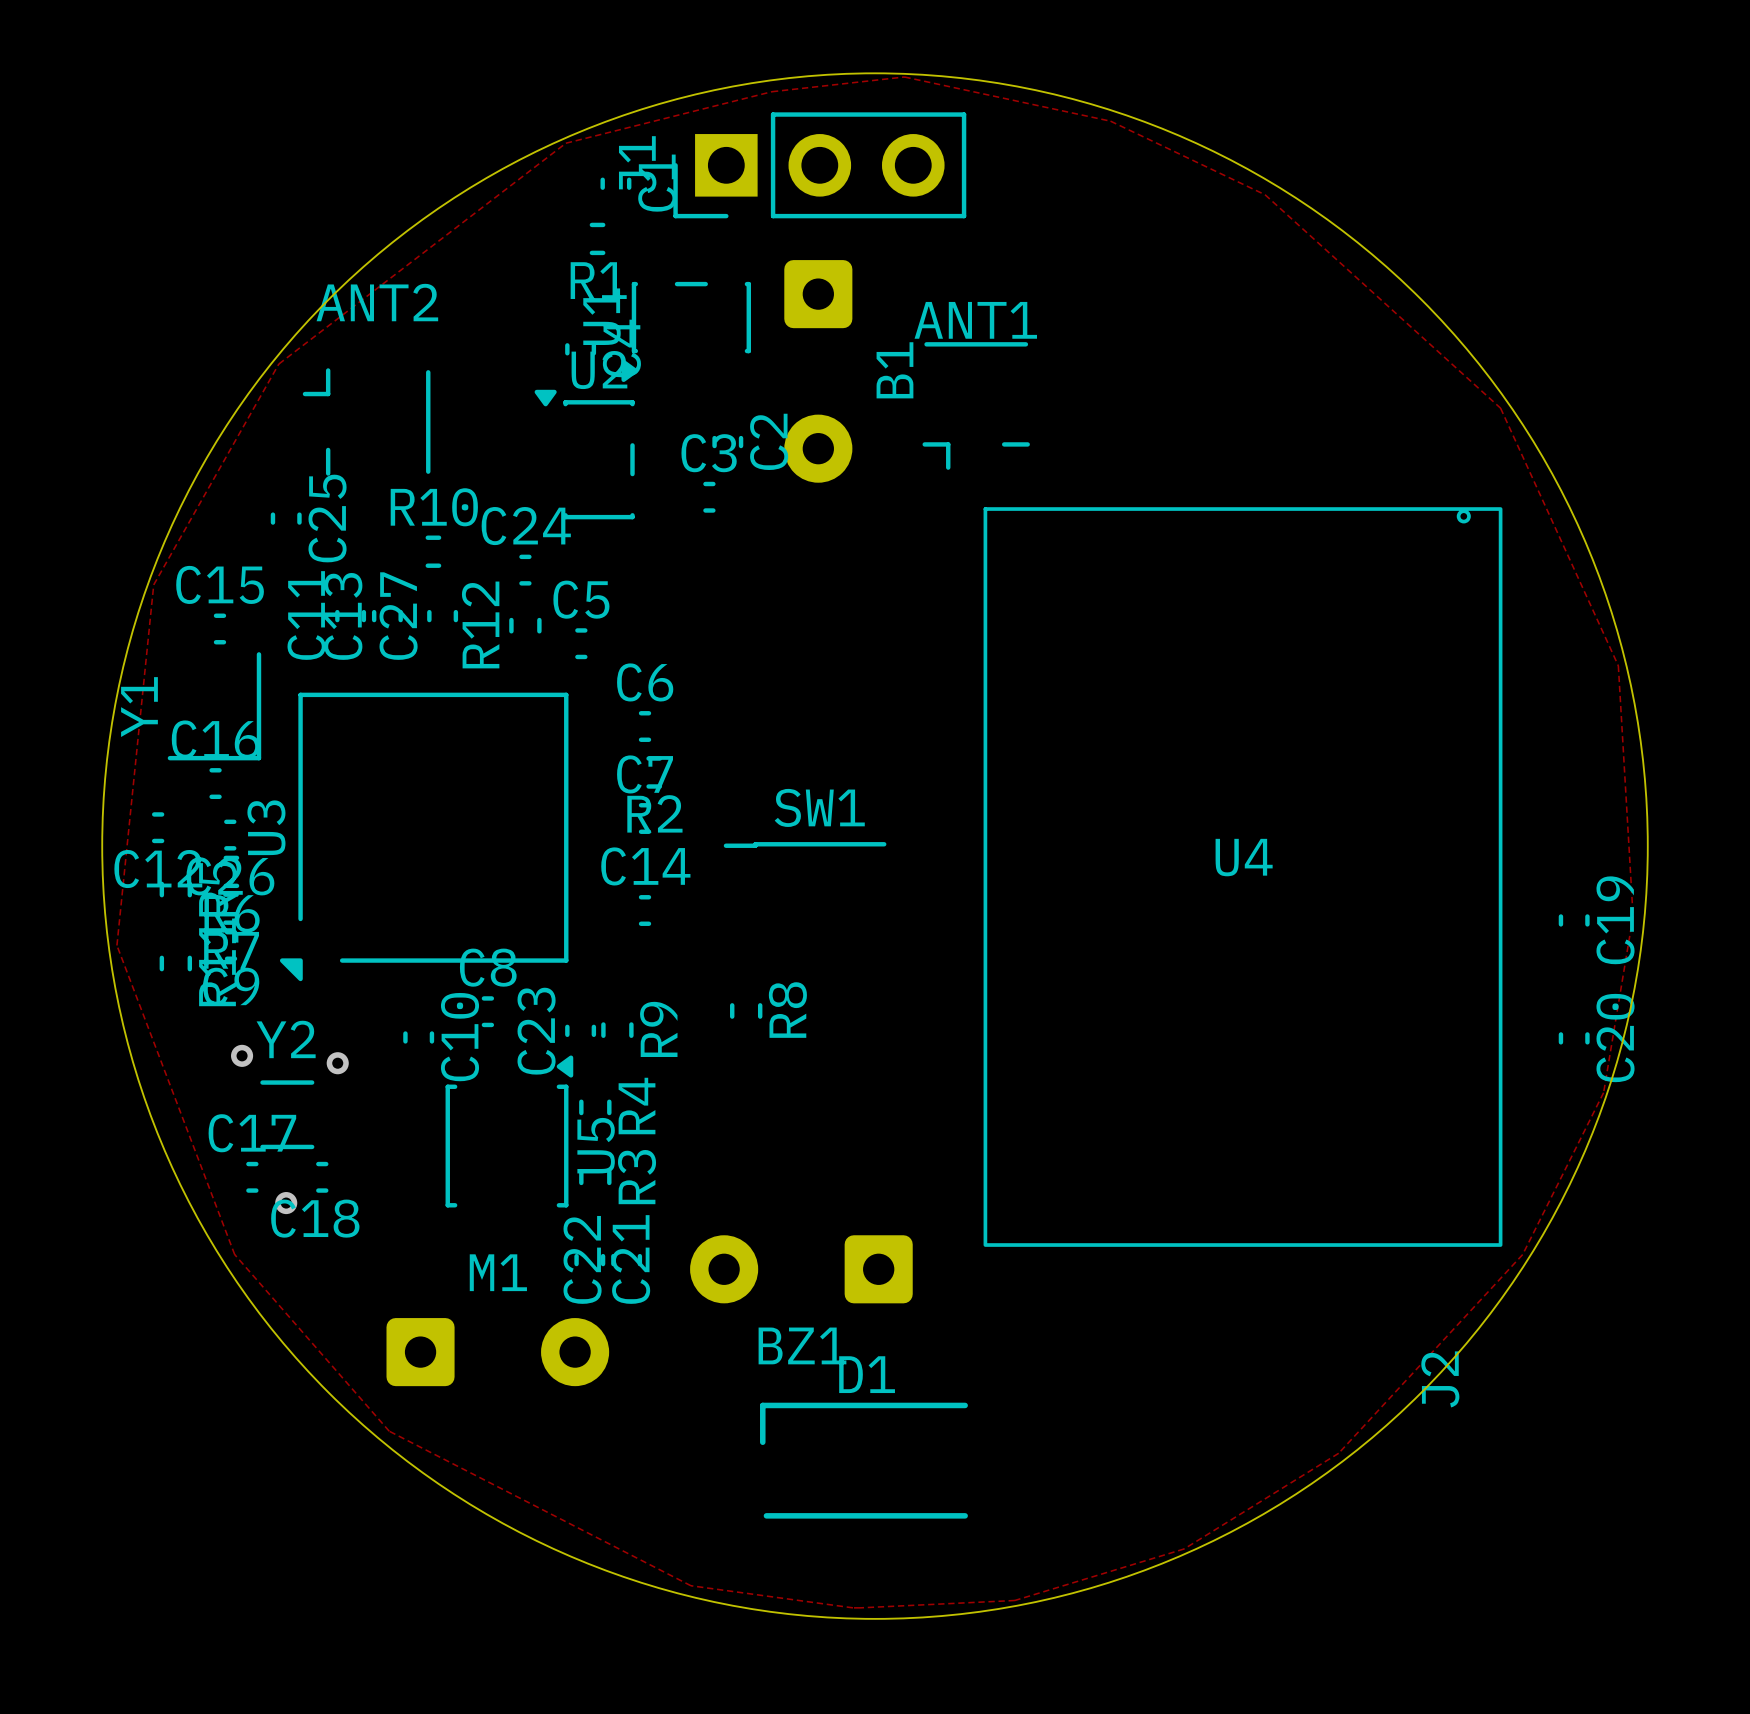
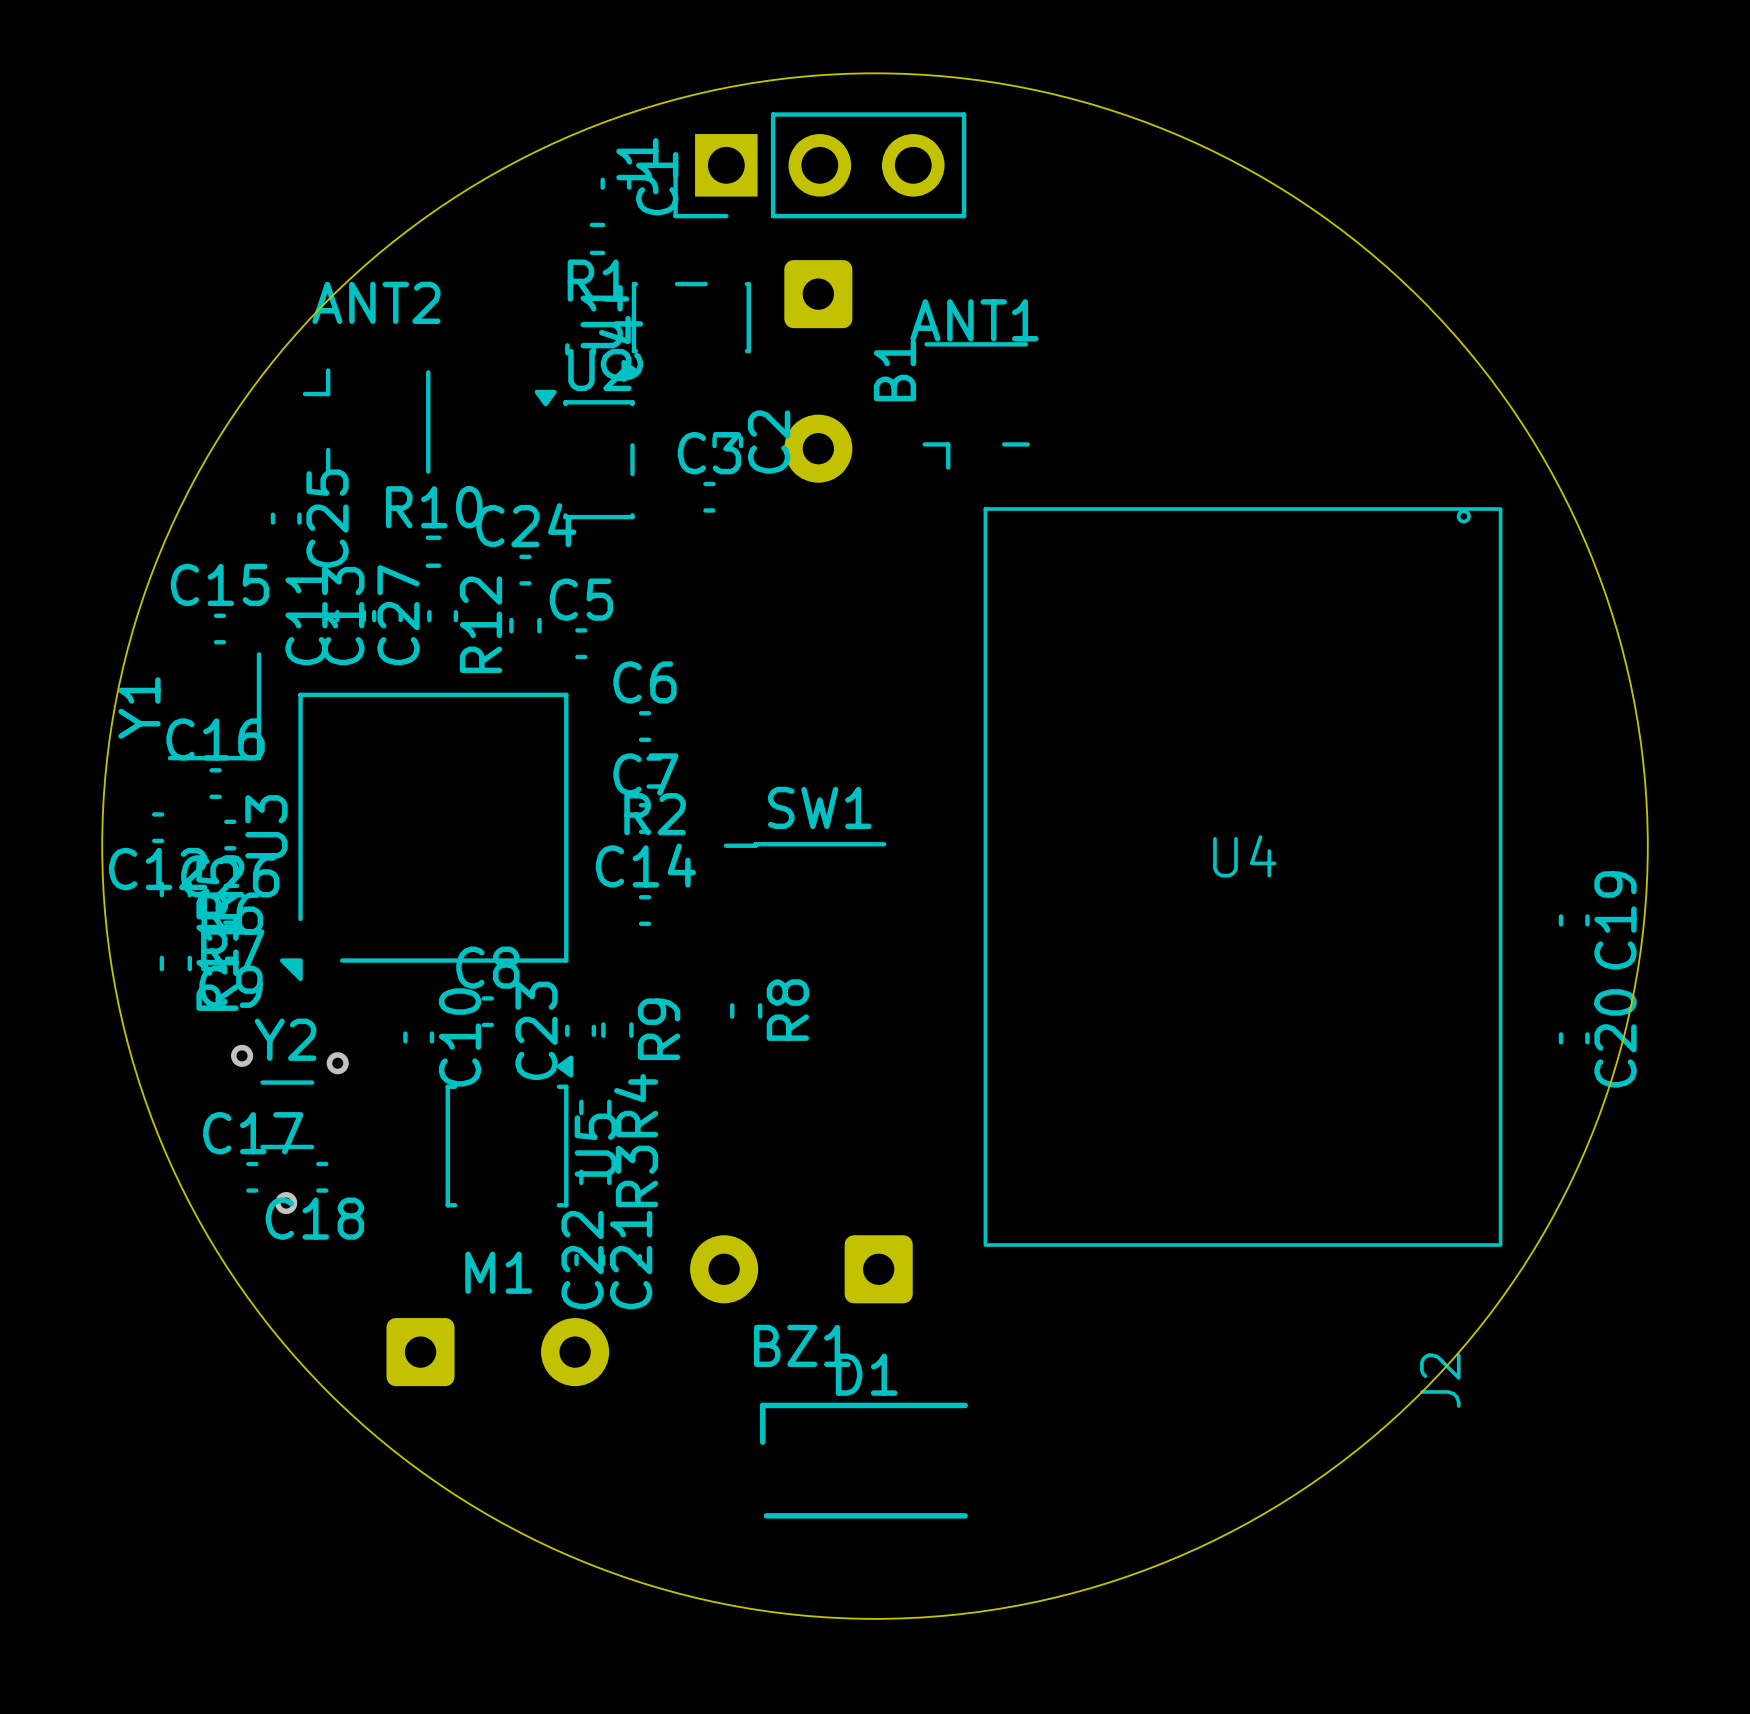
zone outline: (904, 77) (771, 91) (565, 143) (278, 364) (153, 584) (116, 945) (234, 1254) (389, 1431) (691, 1585) (852, 1607) (1014, 1600) (1184, 1548) (1338, 1453) (1522, 1254) (1603, 1092) (1633, 916) (1618, 665) (1500, 408) (1265, 194) (1110, 121) (904, 77) -> none

